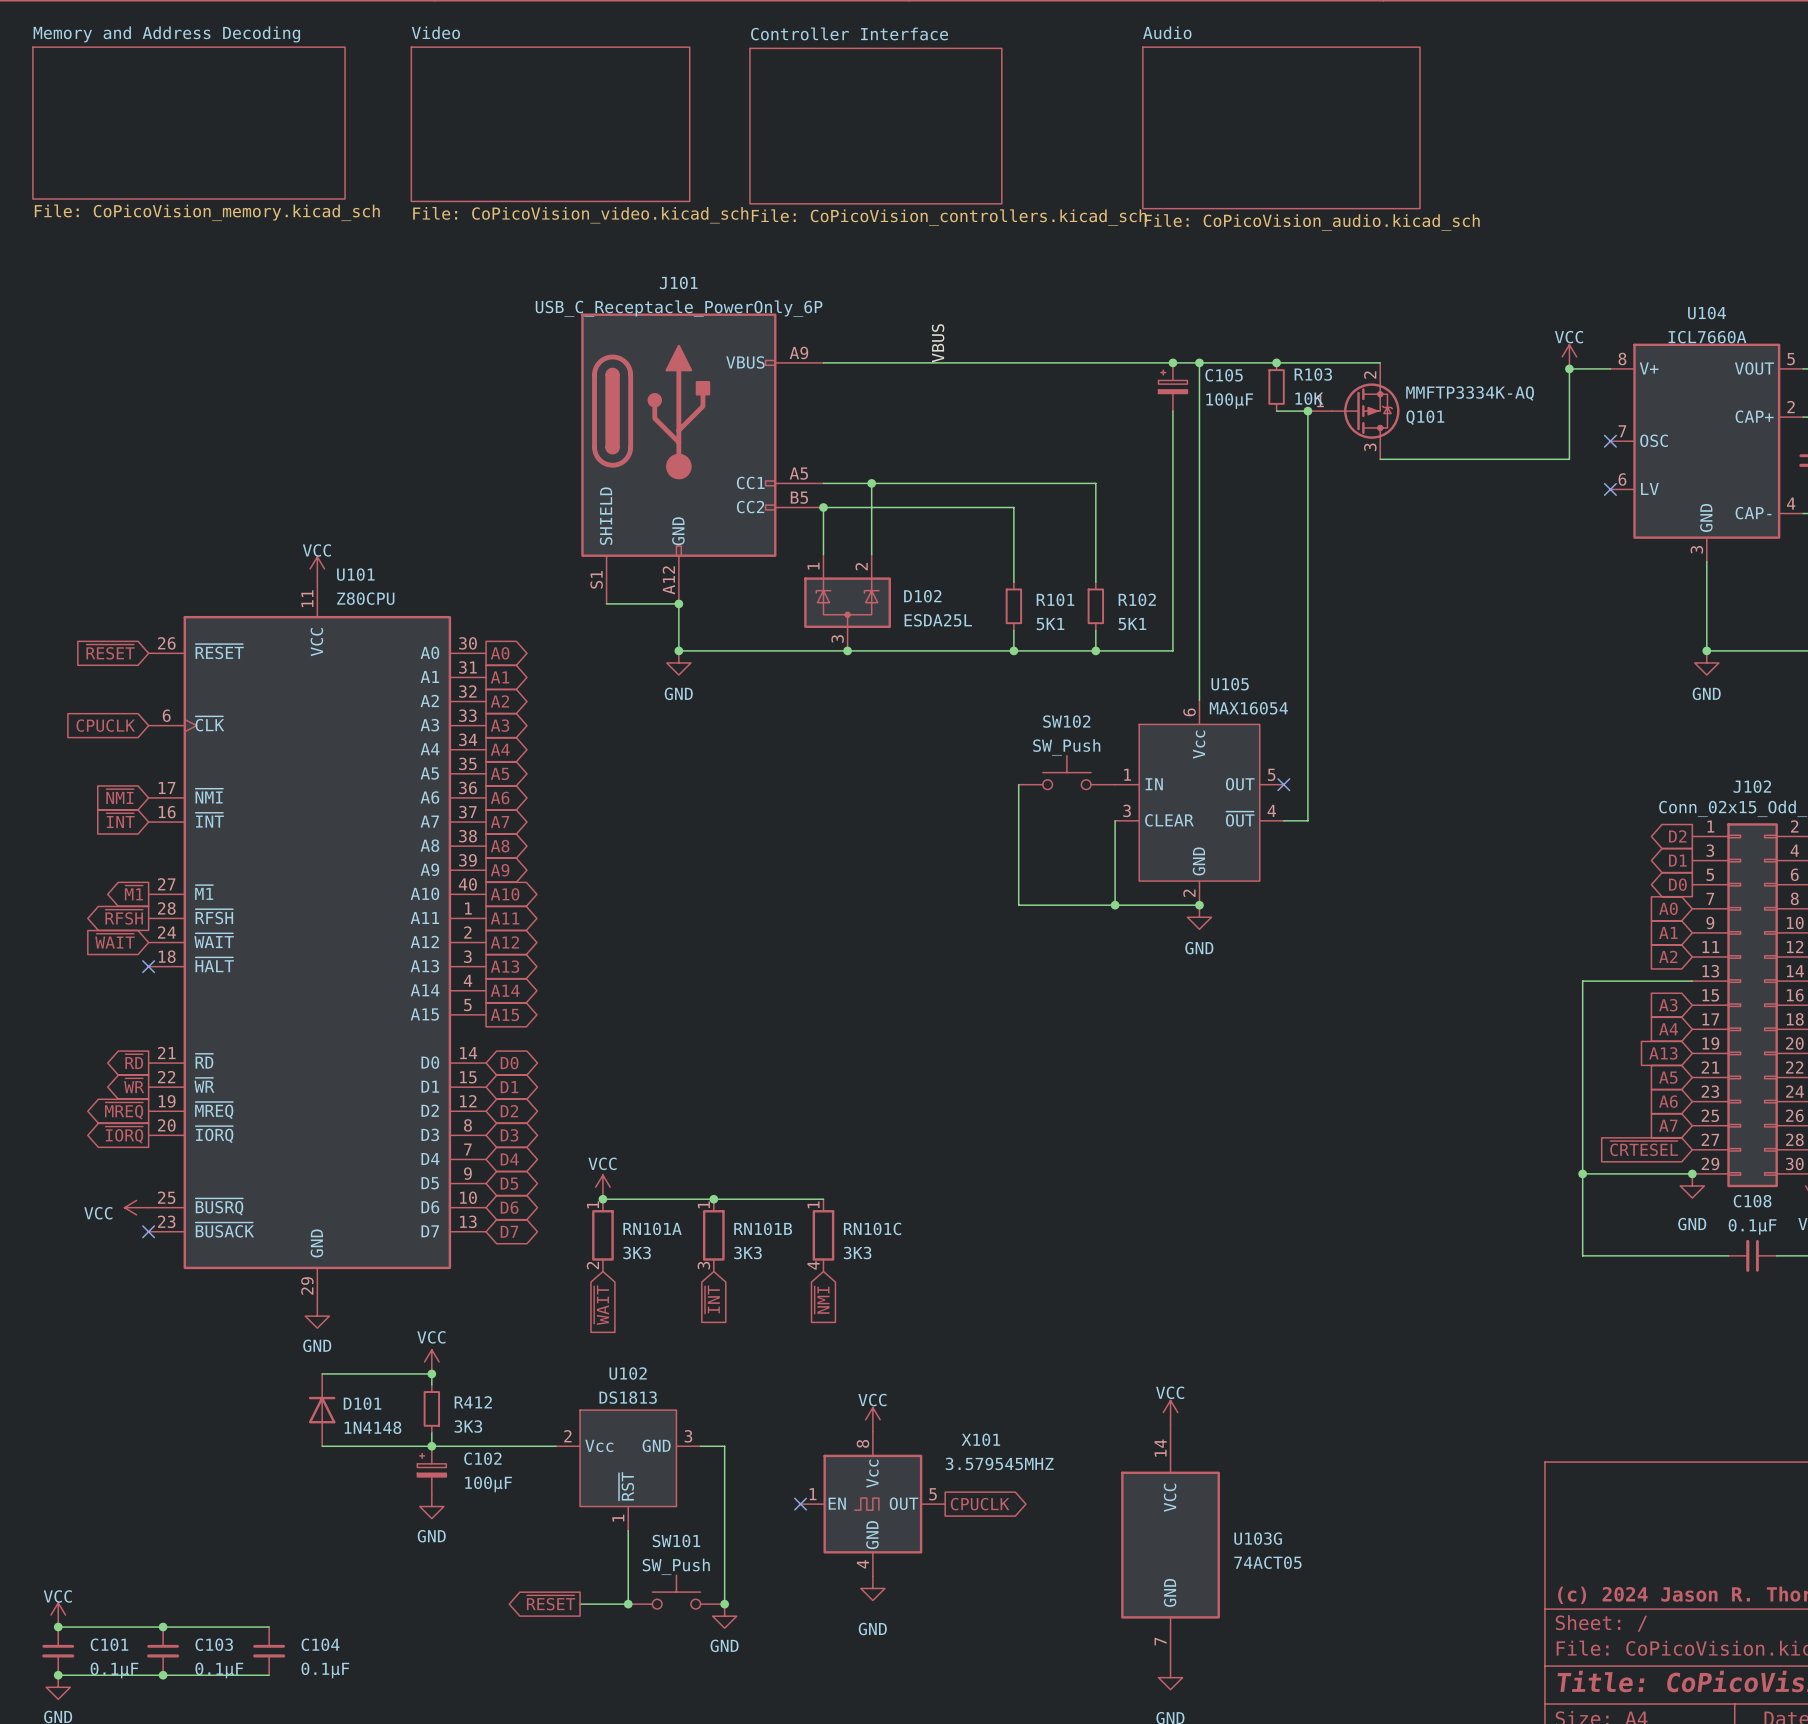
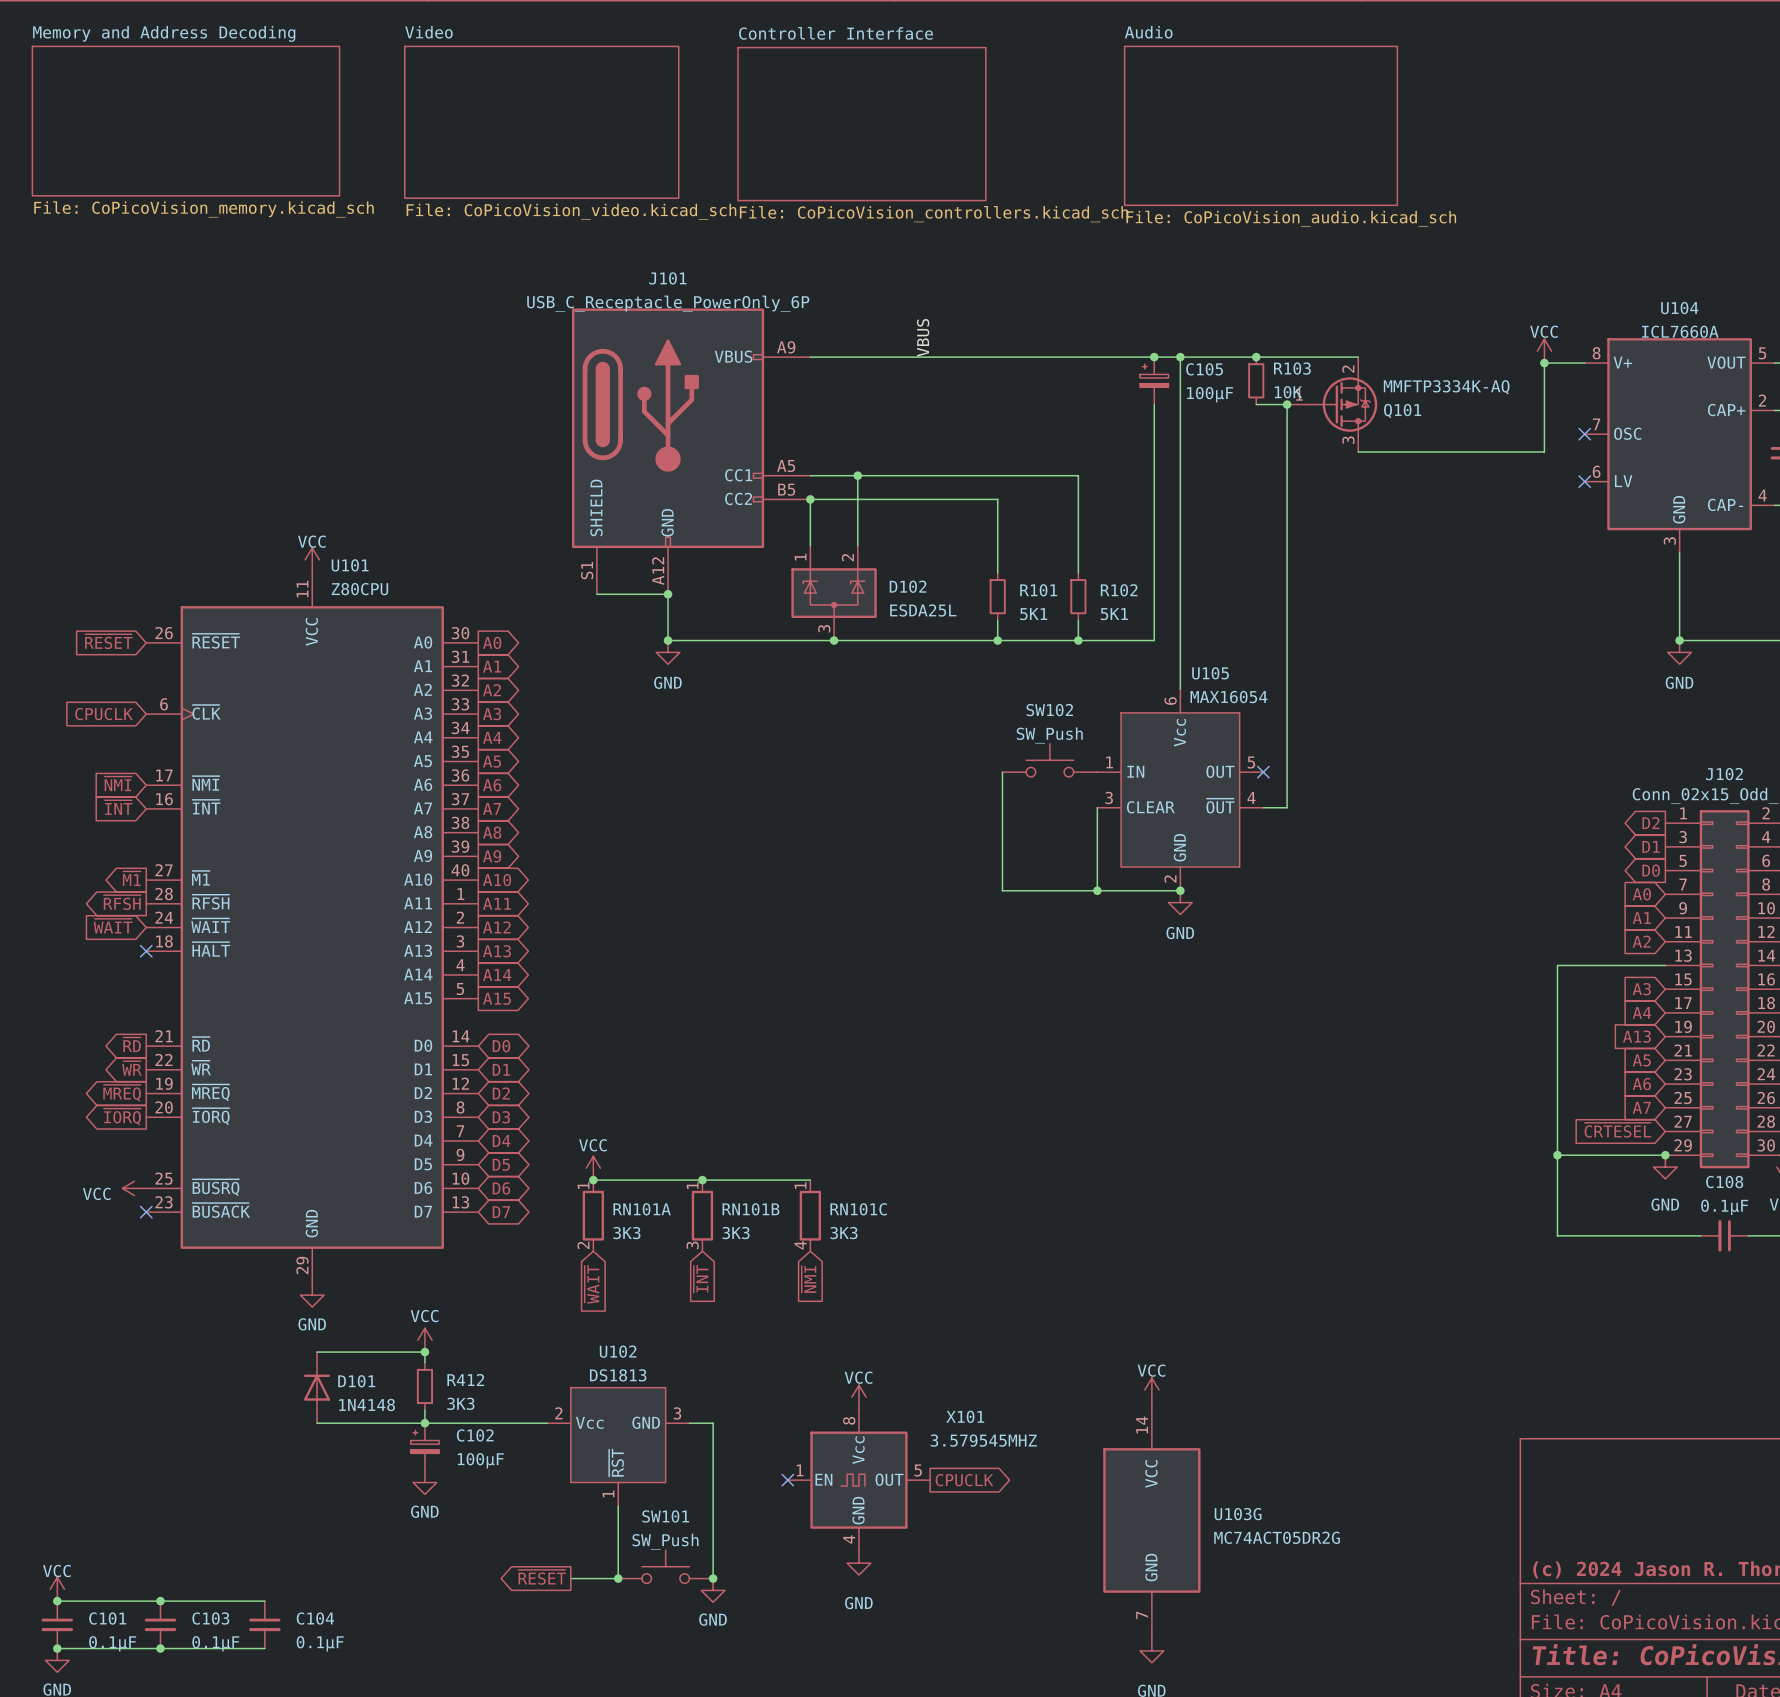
U103G value: 74ACT05 (1267, 1562) -> MC74ACT05DR2G (1277, 1537)

